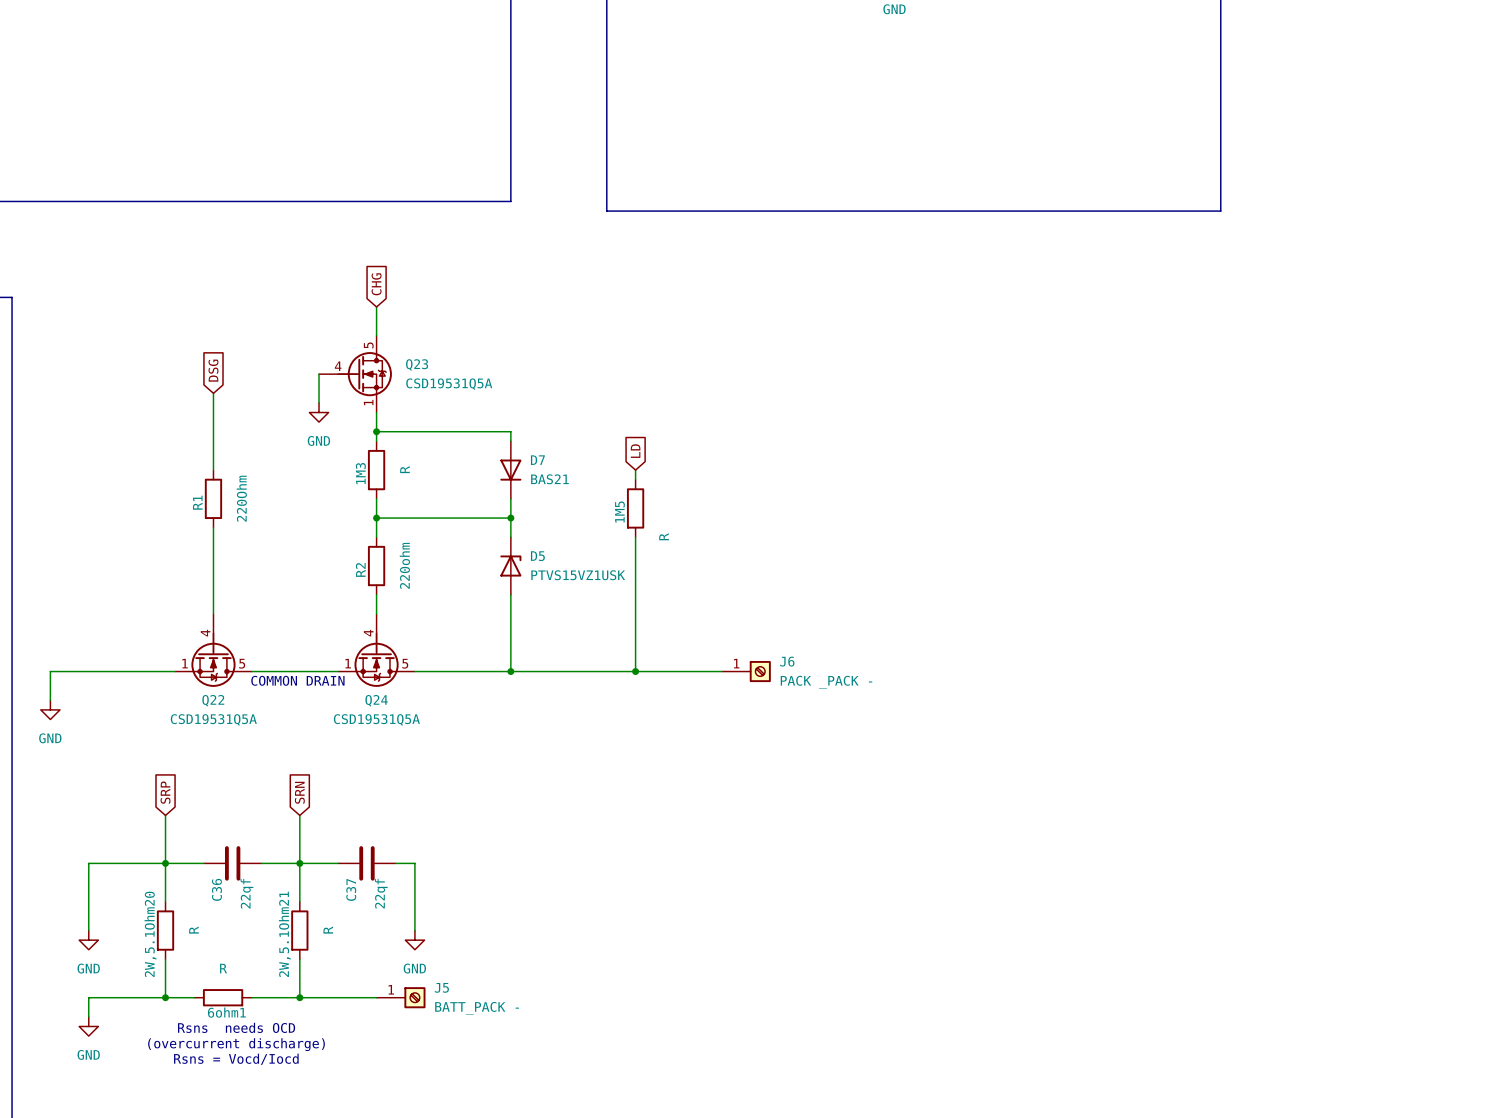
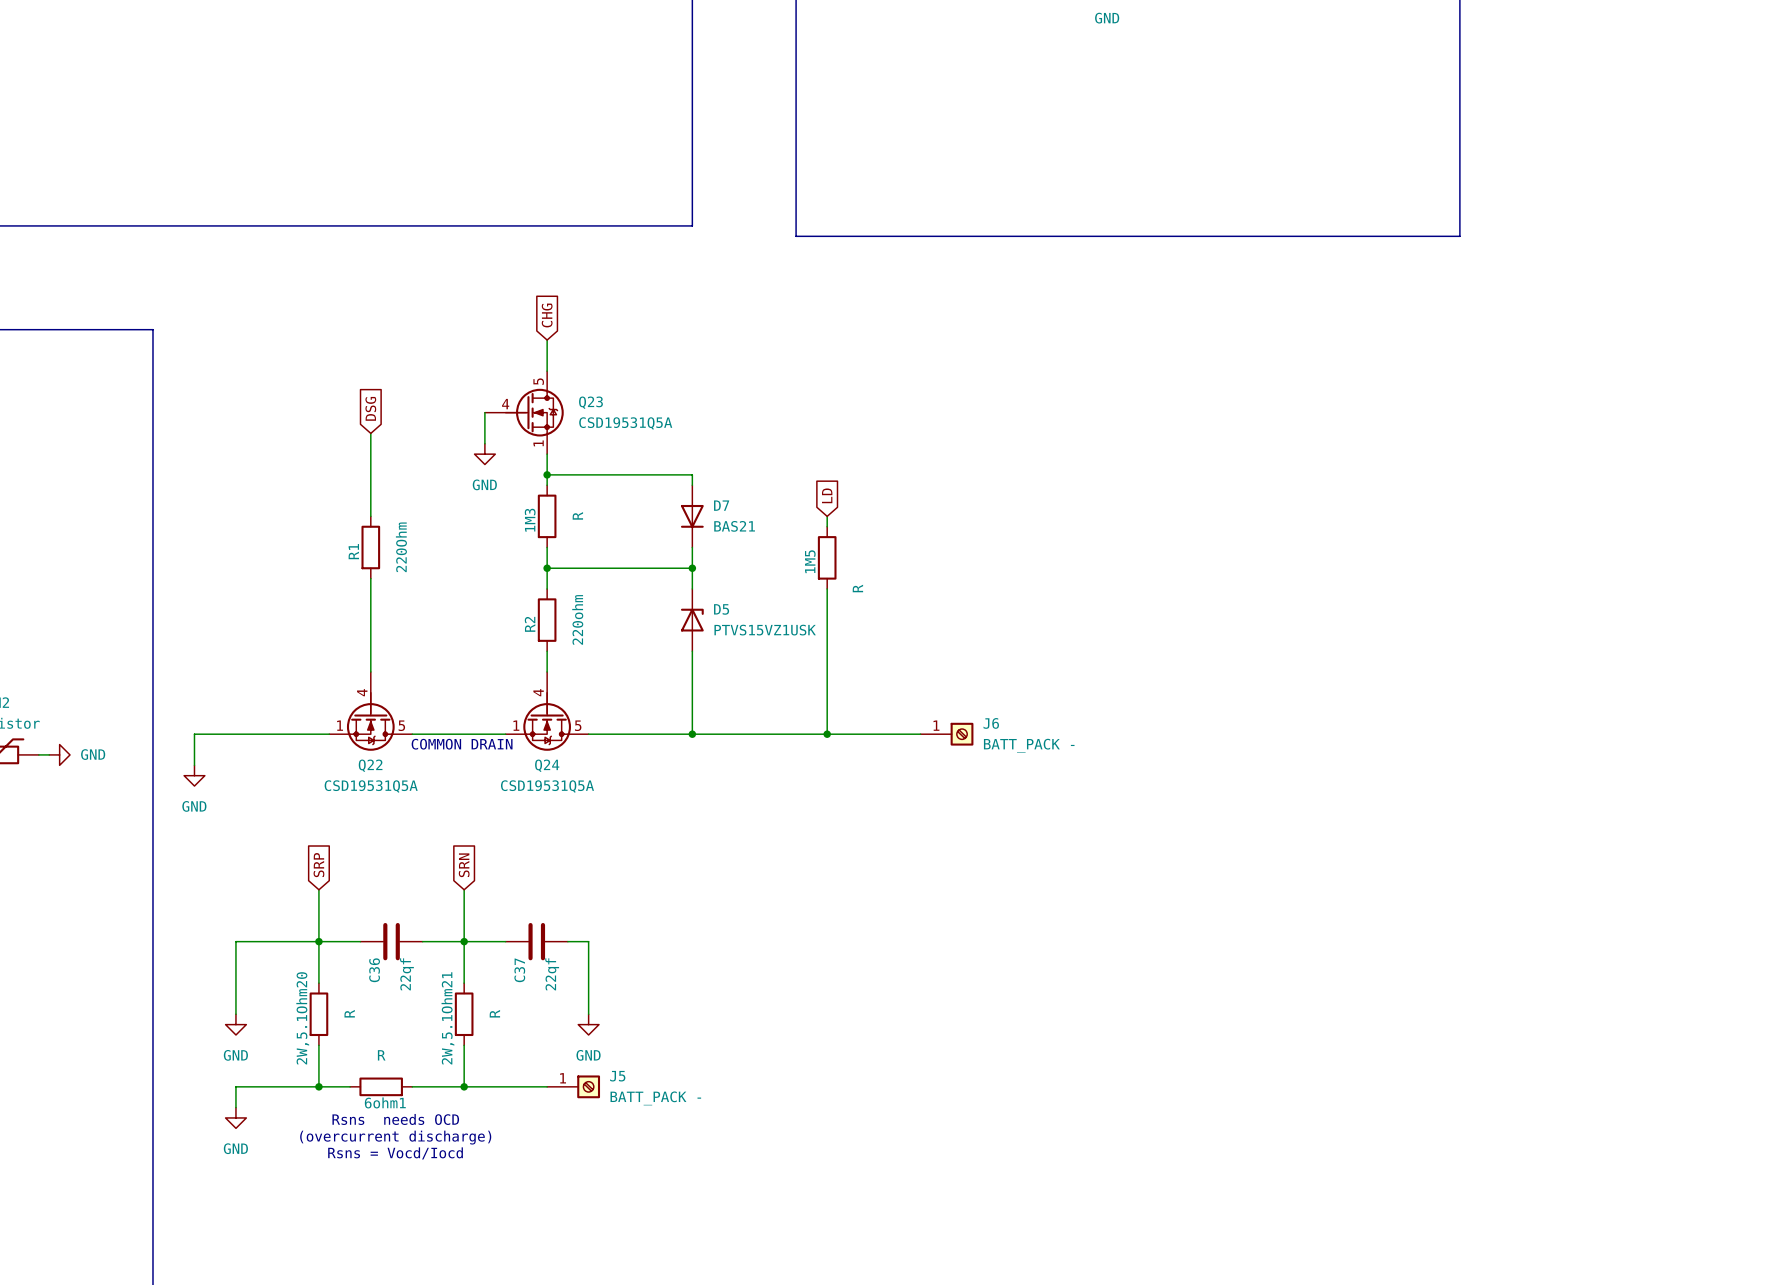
J6 value: PACK _PACK - (826, 682) -> BATT_PACK - (1029, 745)

